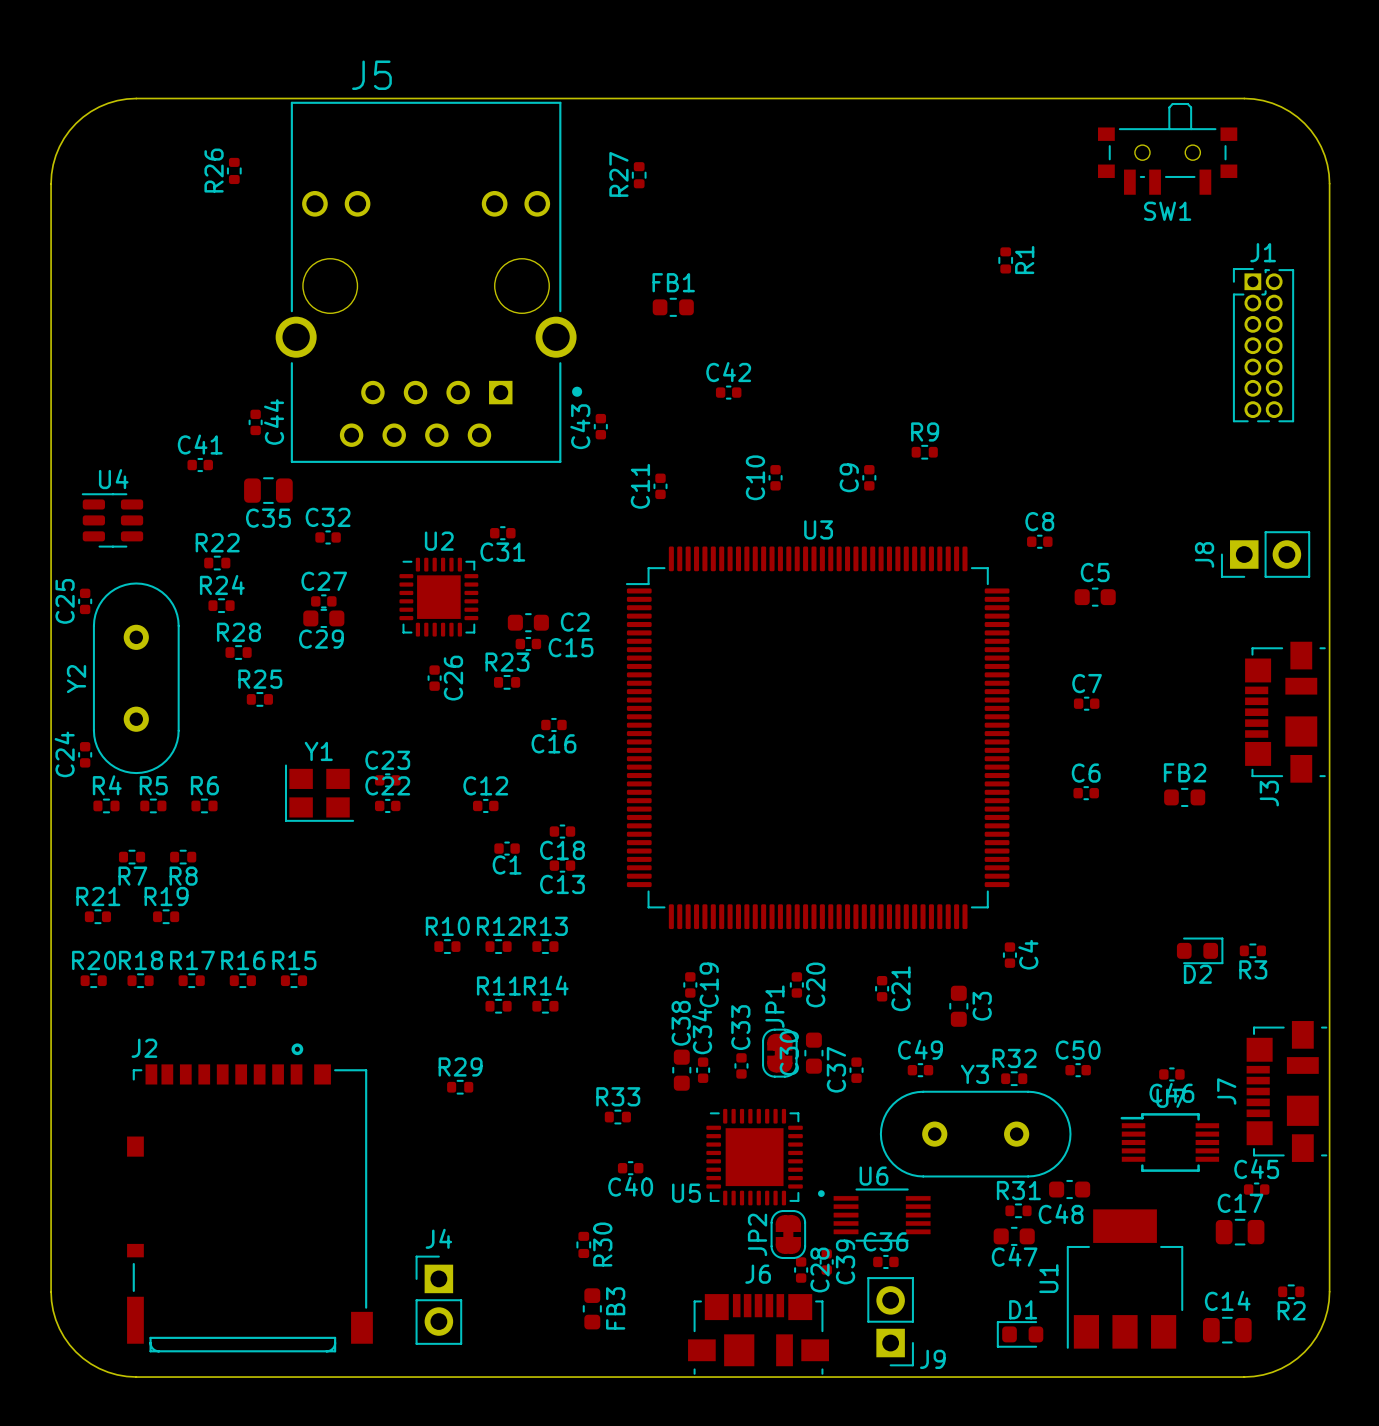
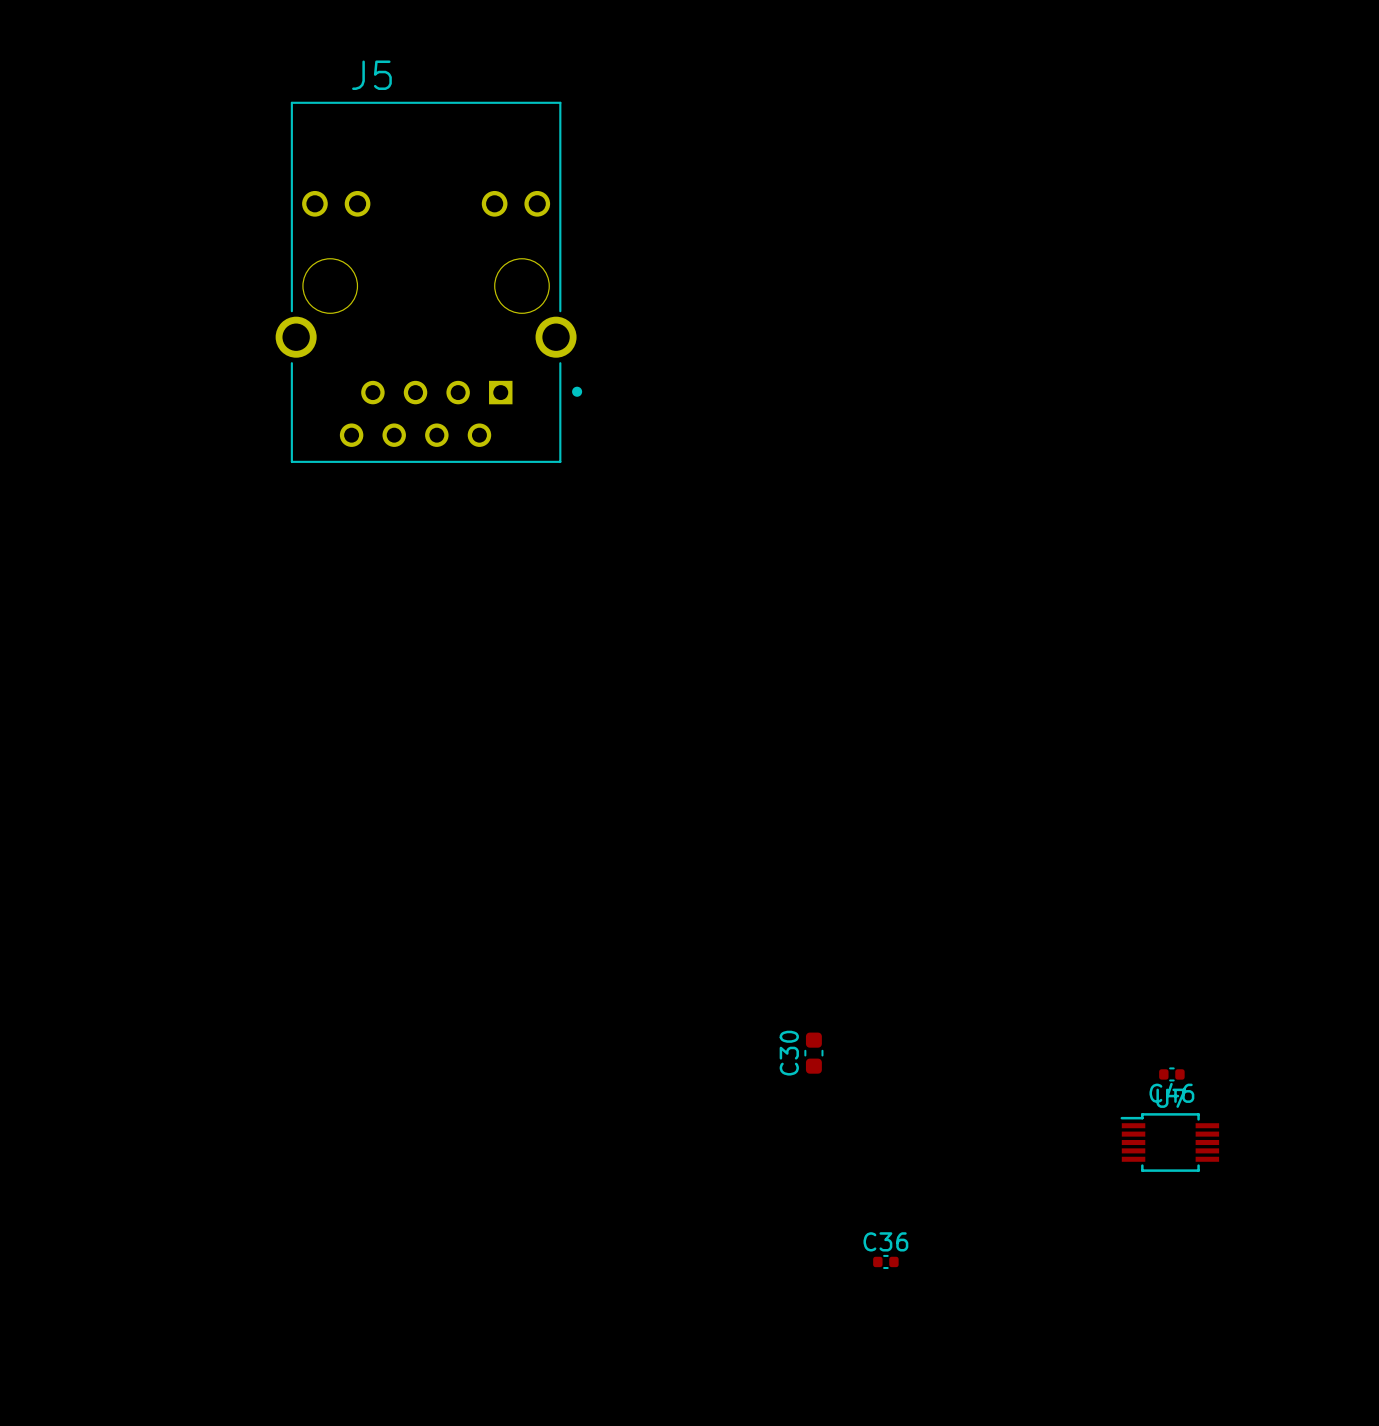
board edge: (136, 98) (1244, 98) (1263, 100) (1281, 106) (1304, 123) (1321, 146) (1327, 164) (1329, 183) (1329, 1291) (1327, 1310) (1321, 1328) (1304, 1352) (1289, 1363) (1272, 1372) (1244, 1377) (136, 1377) (117, 1374) (99, 1368) (76, 1352) (64, 1337) (55, 1319) (51, 1291) (51, 183) (53, 164) (59, 146) (76, 123) (99, 106) (117, 100) (136, 98) -> none
SW1: (1167, 148) -> none
R26: (234, 170) -> none
R27: (639, 175) -> none
R1: (1005, 260) -> none
FB1: (673, 307) -> none
J1: (1263, 345) -> none
C42: (728, 392) -> none
C44: (255, 422) -> none
C43: (600, 426) -> none
R9: (924, 452) -> none
C41: (200, 465) -> none
C10: (775, 477) -> none
C9: (869, 477) -> none
C11: (660, 486) -> none
C35: (268, 490) -> none
U4: (112, 520) -> none
C31: (502, 533) -> none
C32: (328, 537) -> none
C8: (1039, 541) -> none
J8: (1265, 554) -> none
R22: (217, 563) -> none
U2: (438, 597) -> none
C5: (1095, 597) -> none
C25: (85, 601) -> none
C27: (323, 601) -> none
R24: (221, 605) -> none
C29: (323, 618) -> none
C2: (528, 622) -> none
C15: (528, 644) -> none
R28: (238, 652) -> none
Y2: (136, 678) -> none
C26: (434, 678) -> none
R23: (507, 682) -> none
R25: (259, 699) -> none
C7: (1086, 703) -> none
J3: (1285, 712) -> none
C16: (553, 724) -> none
U3: (817, 737) -> none
C24: (85, 754) -> none
C23: (387, 780) -> none
Y1: (319, 793) -> none
C6: (1086, 793) -> none
FB2: (1184, 797) -> none
R4: (106, 805) -> none
R5: (153, 805) -> none
R6: (204, 805) -> none
C22: (387, 805) -> none
C12: (485, 805) -> none
C18: (562, 831) -> none
C1: (507, 848) -> none
R7: (132, 857) -> none
R8: (183, 857) -> none
C13: (562, 865) -> none
R21: (97, 916) -> none
R19: (166, 916) -> none
R10: (447, 946) -> none
R12: (498, 946) -> none
R13: (545, 946) -> none
D2: (1200, 950) -> none
R3: (1252, 950) -> none
C4: (1009, 955) -> none
R20: (93, 980) -> none
R18: (140, 980) -> none
R17: (191, 980) -> none
R16: (242, 980) -> none
R15: (293, 980) -> none
C19: (690, 984) -> none
C20: (796, 984) -> none
C21: (882, 988) -> none
R11: (498, 1006) -> none
R14: (545, 1006) -> none
C3: (958, 1006) -> none
JP1: (779, 1053) -> none
C33: (741, 1065) -> none
C38: (681, 1070) -> none
C34: (703, 1070) -> none
C37: (856, 1070) -> none
C49: (920, 1070) -> none
C50: (1078, 1070) -> none
R32: (1014, 1078) -> none
R29: (460, 1087) -> none
J7: (1286, 1091) -> none
R33: (617, 1117) -> none
Y3: (975, 1134) -> none
U5: (754, 1157) -> none
C40: (630, 1168) -> none
C48: (1069, 1189) -> none
C45: (1256, 1189) -> none
J2: (249, 1197) -> none
R31: (1018, 1210) -> none
U6: (874, 1215) -> none
C17: (1240, 1232) -> none
JP2: (788, 1234) -> none
C47: (1014, 1236) -> none
R30: (583, 1244) -> none
C39: (826, 1261) -> none
C28: (801, 1270) -> none
U1: (1125, 1279) -> none
R2: (1291, 1291) -> none
J4: (438, 1300) -> none
FB3: (592, 1308) -> none
J9: (890, 1321) -> none
C14: (1227, 1330) -> none
J6: (758, 1334) -> none
D1: (1020, 1334) -> none

